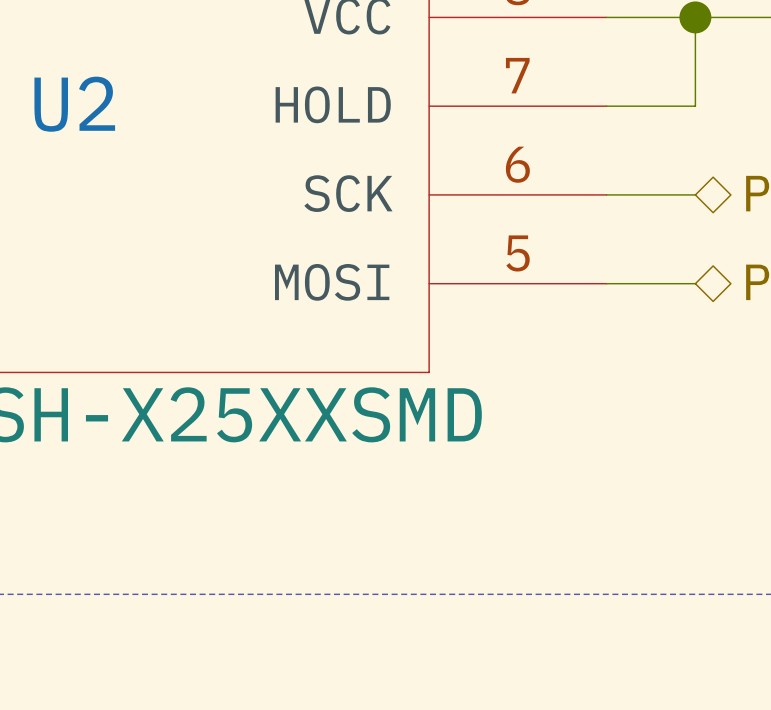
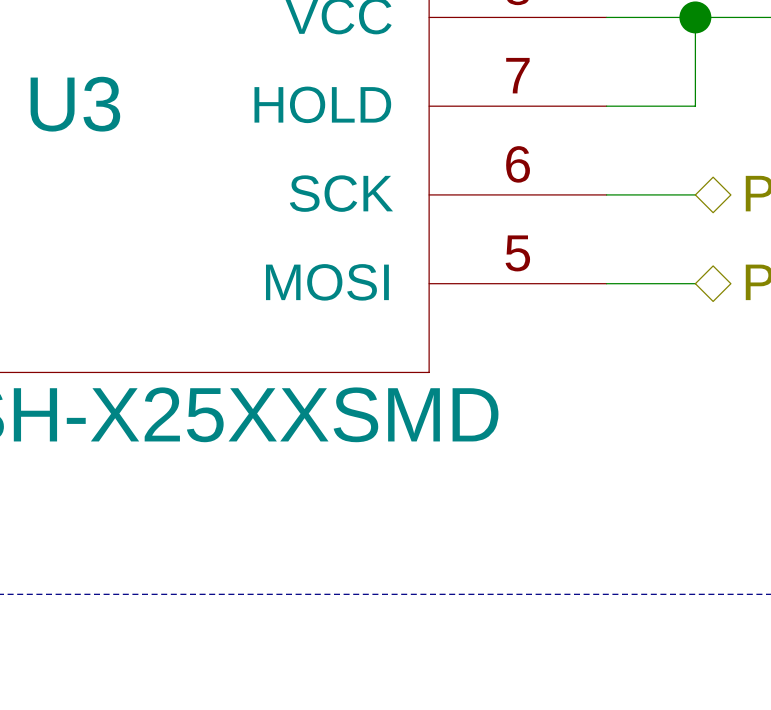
U2 name: U2 (74, 104) -> U3 (75, 104)

